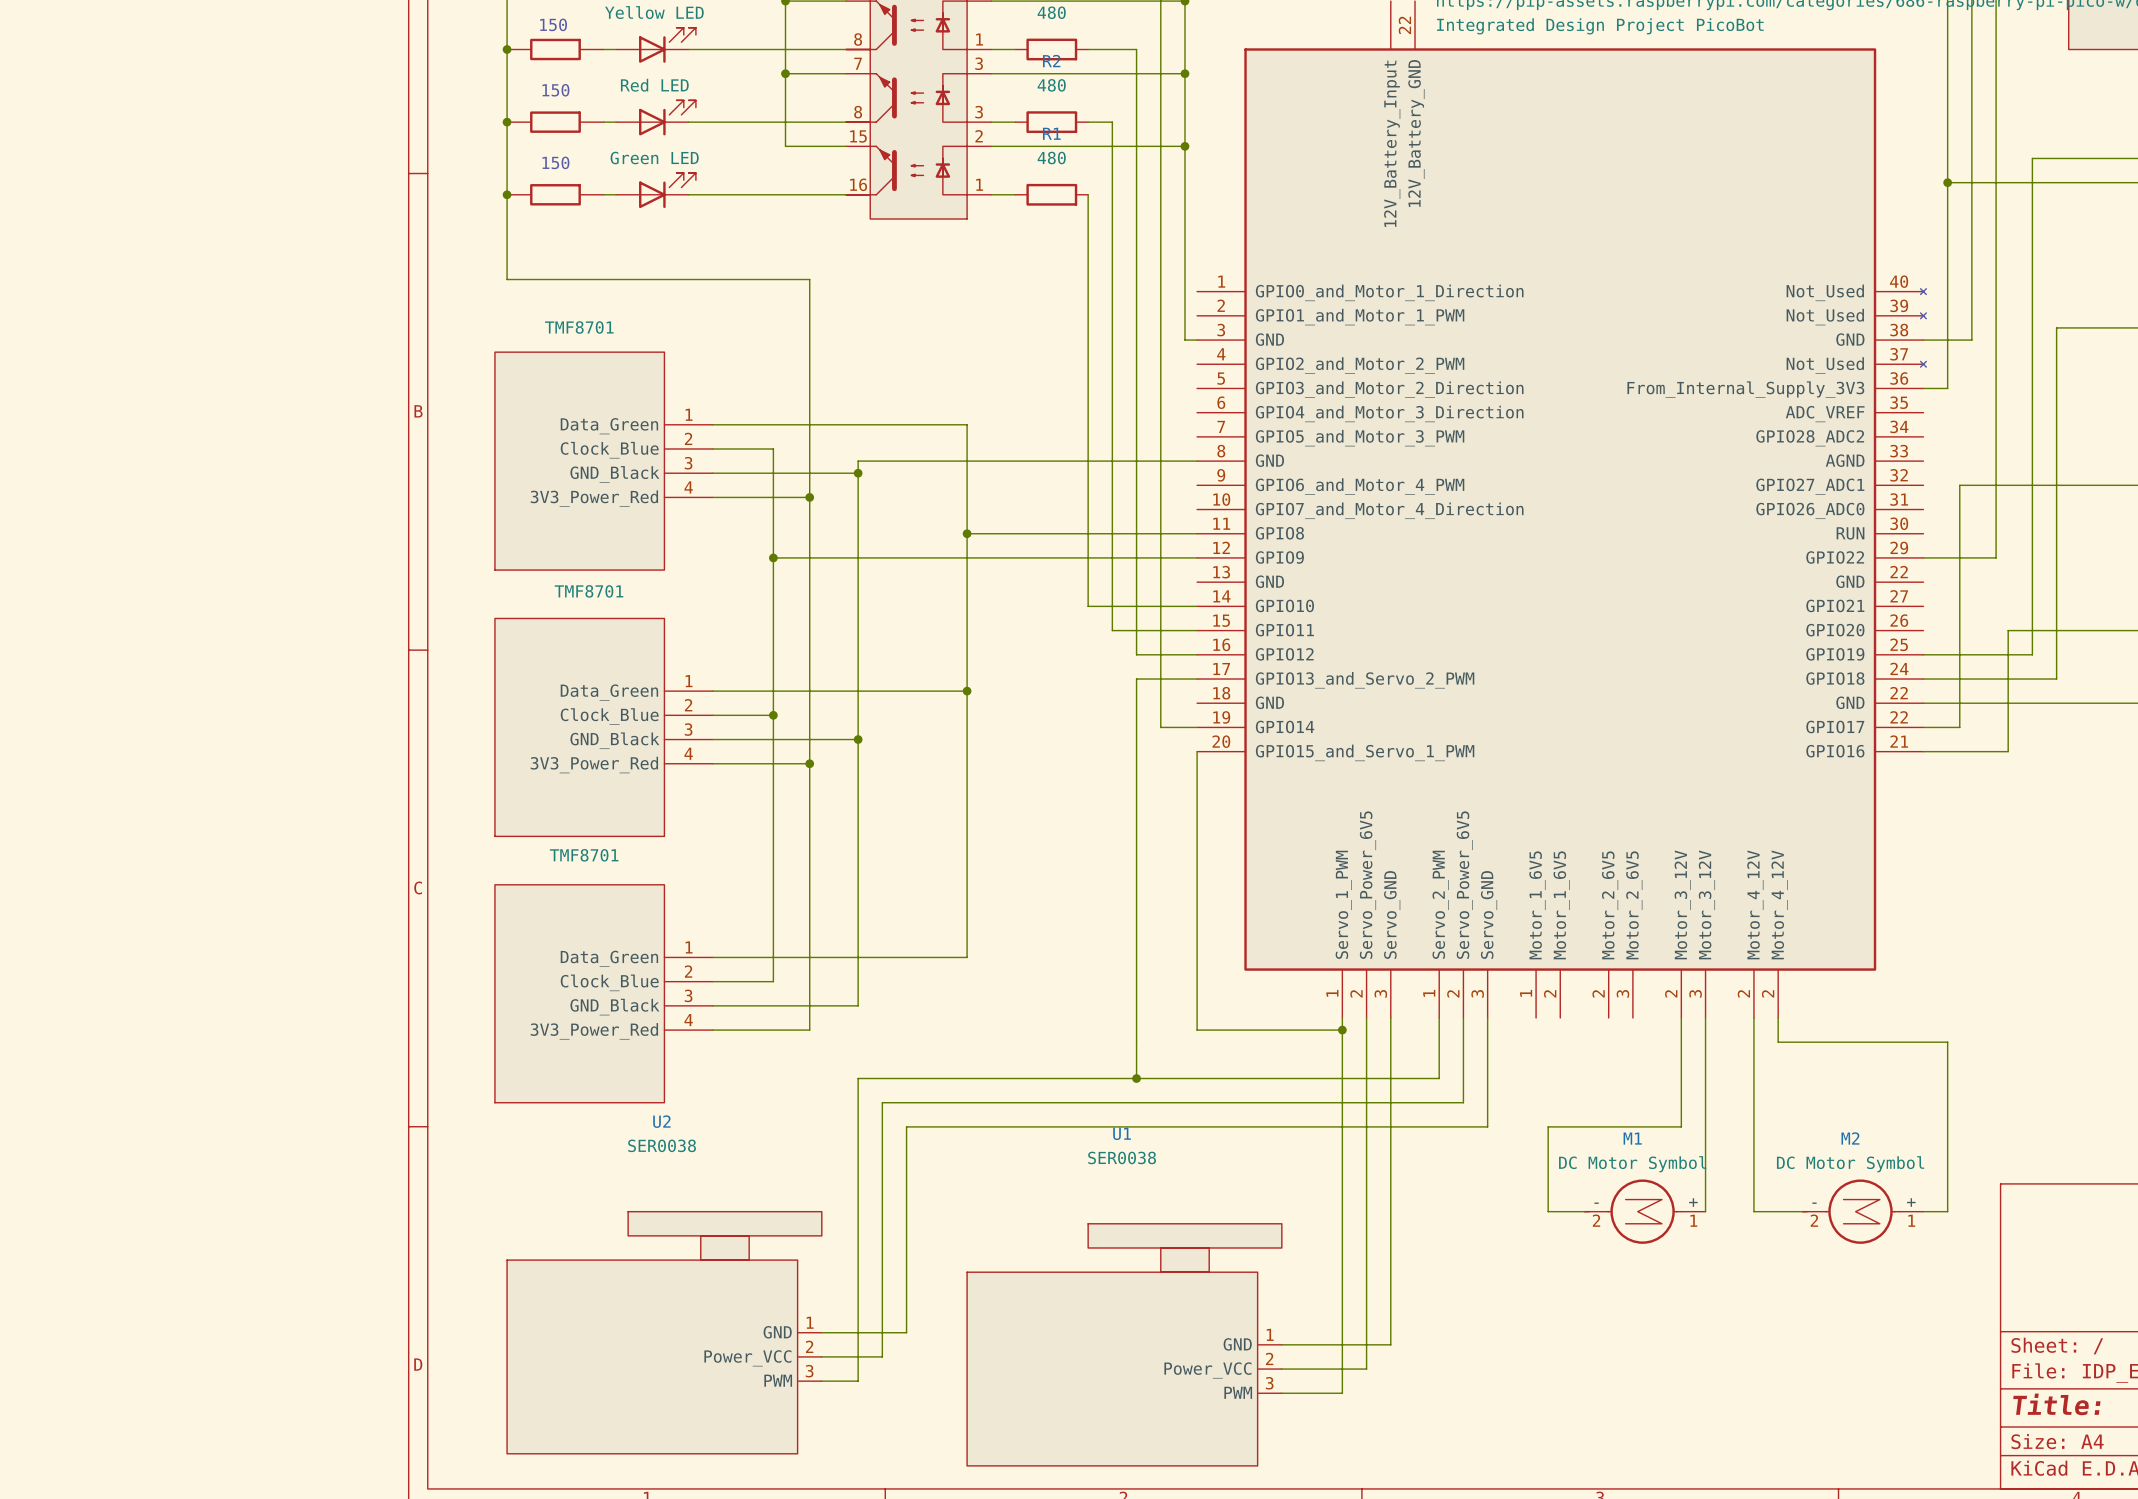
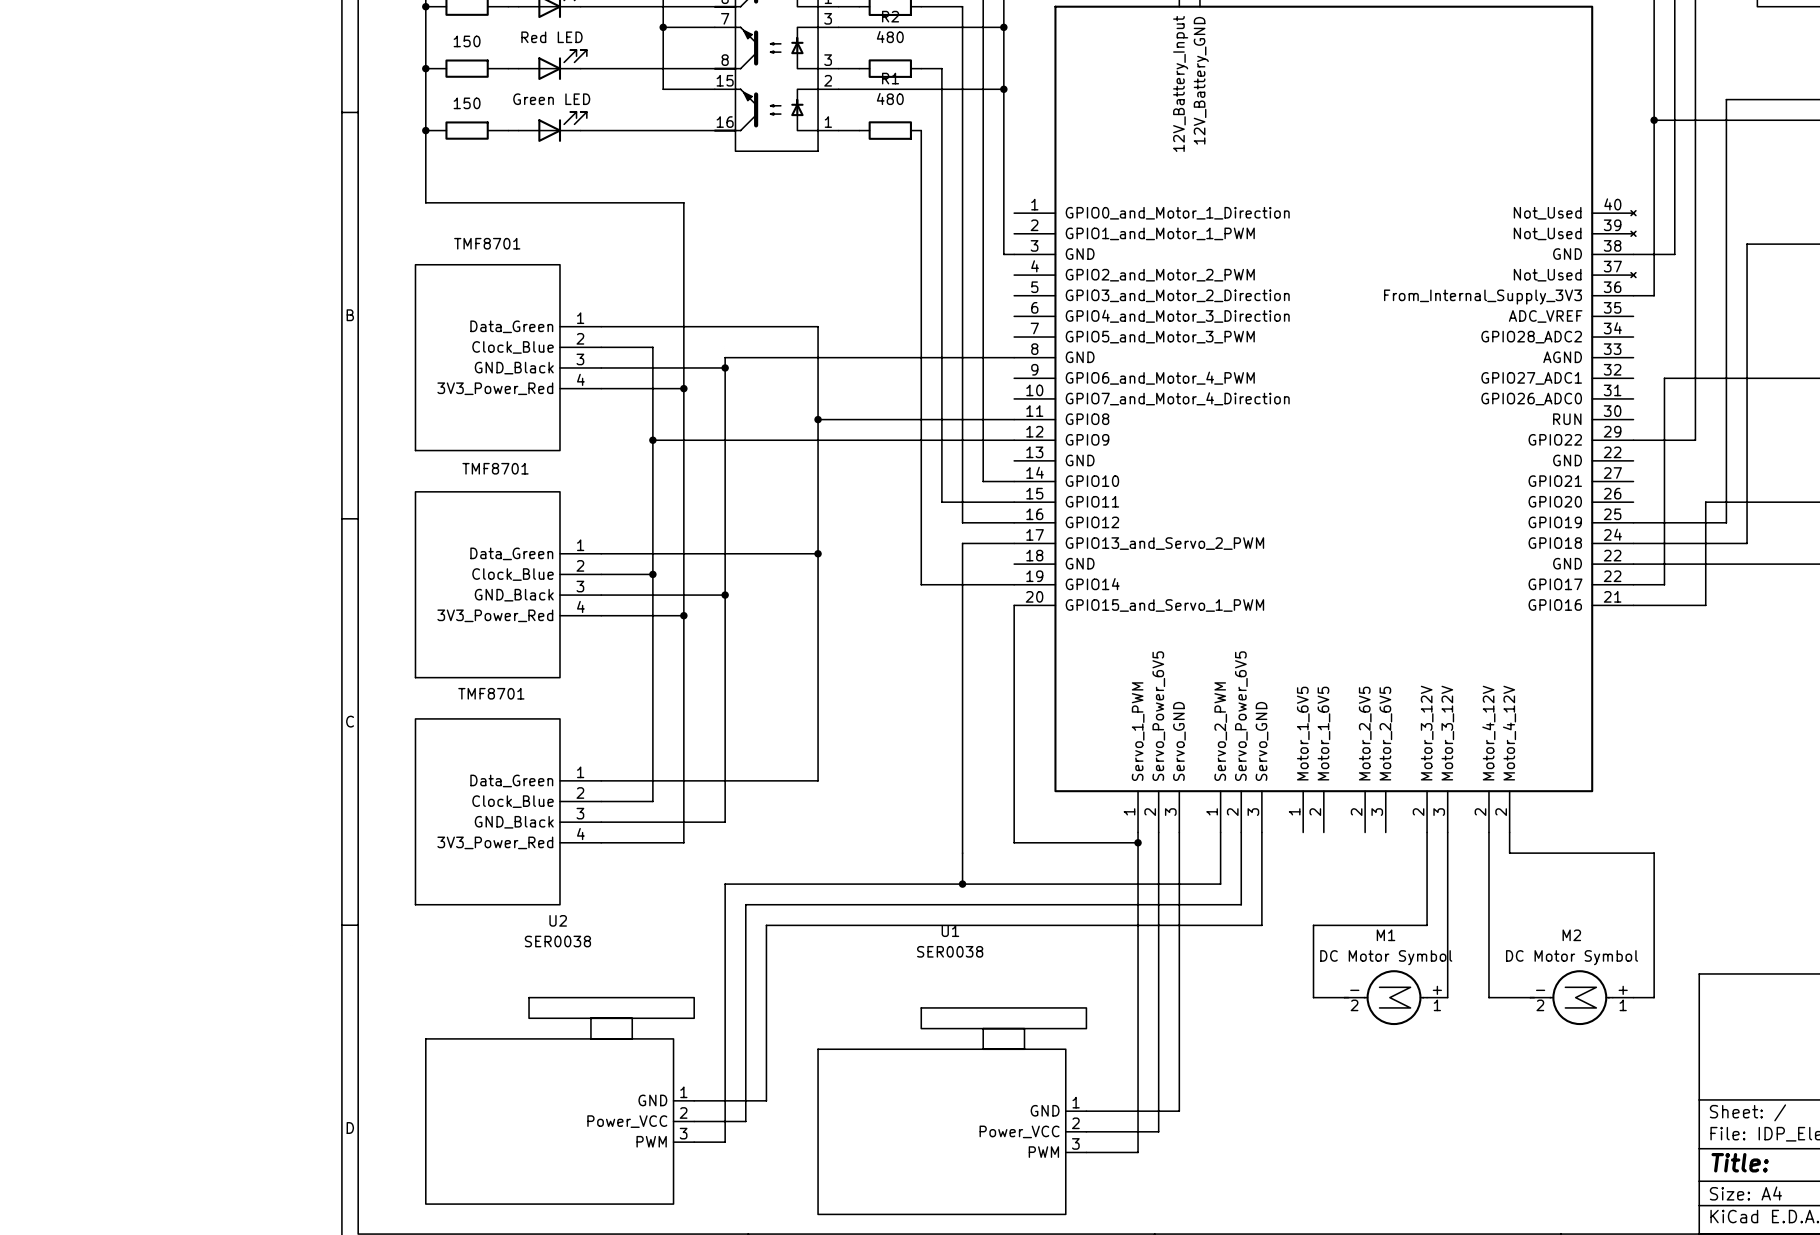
wire: (1088, 606) (1160, 606) (1160, 727) -> (921, 481) (921, 584) (983, 584)

